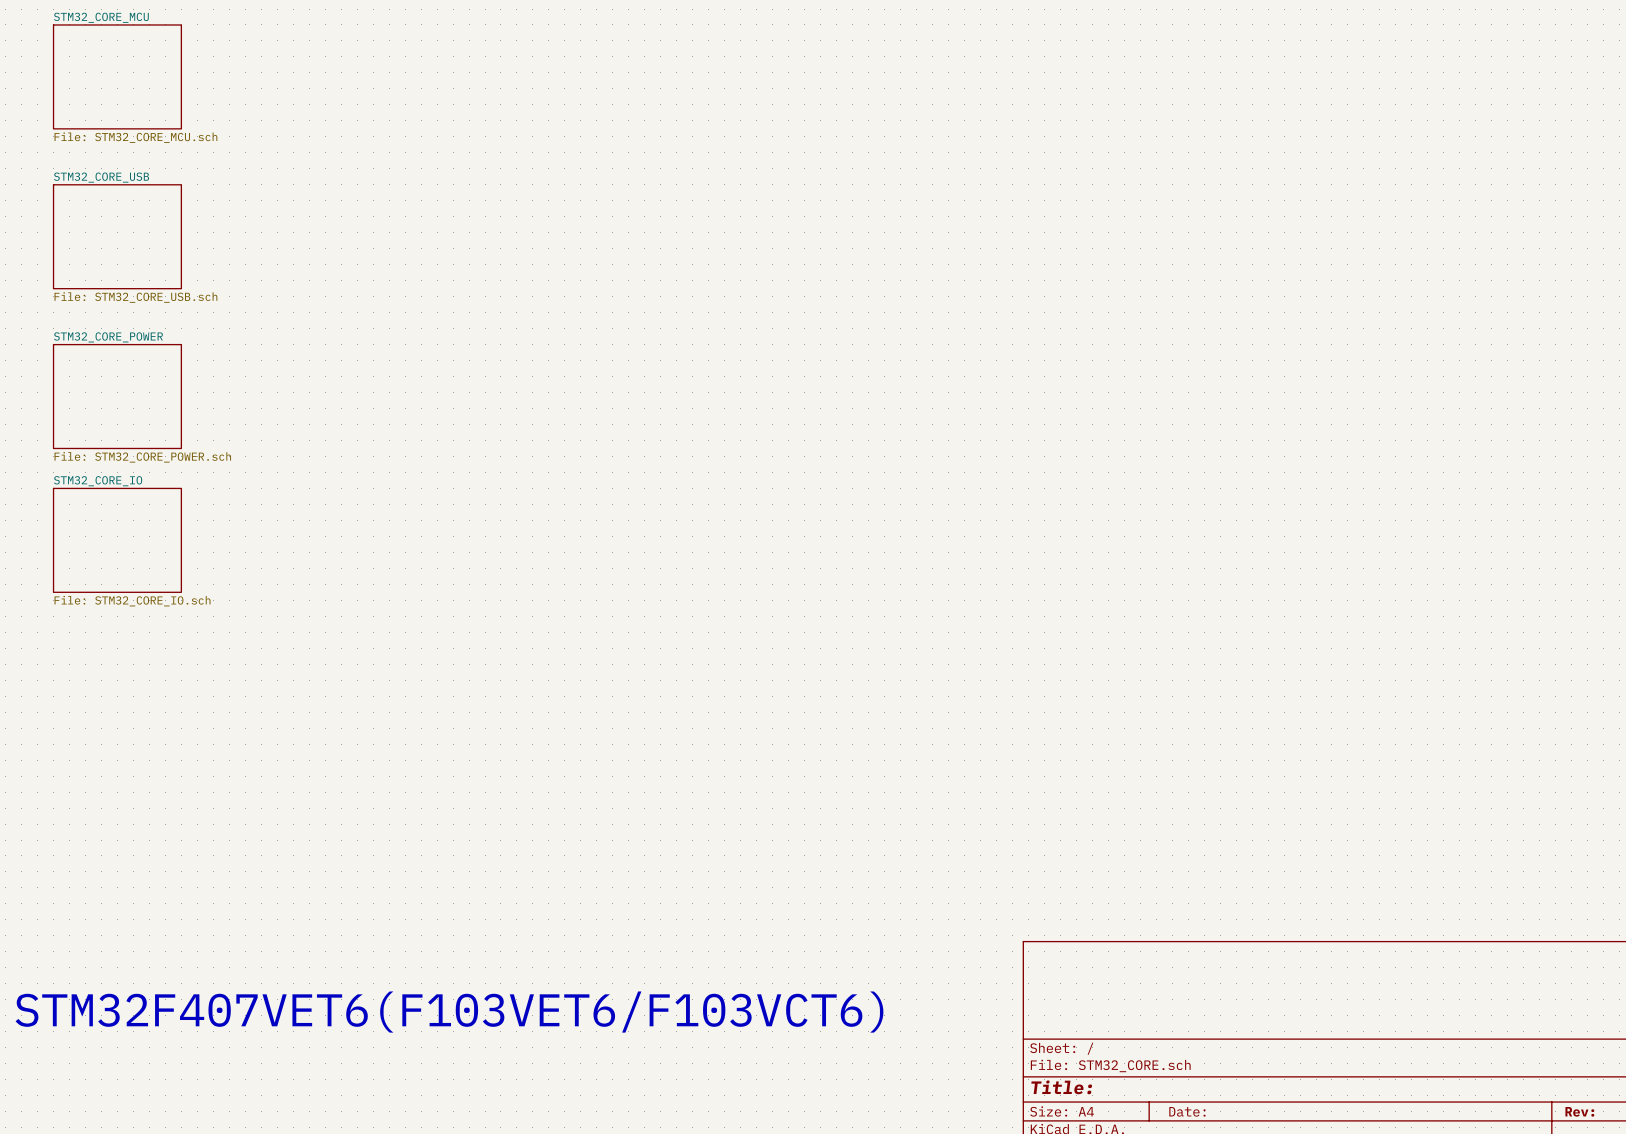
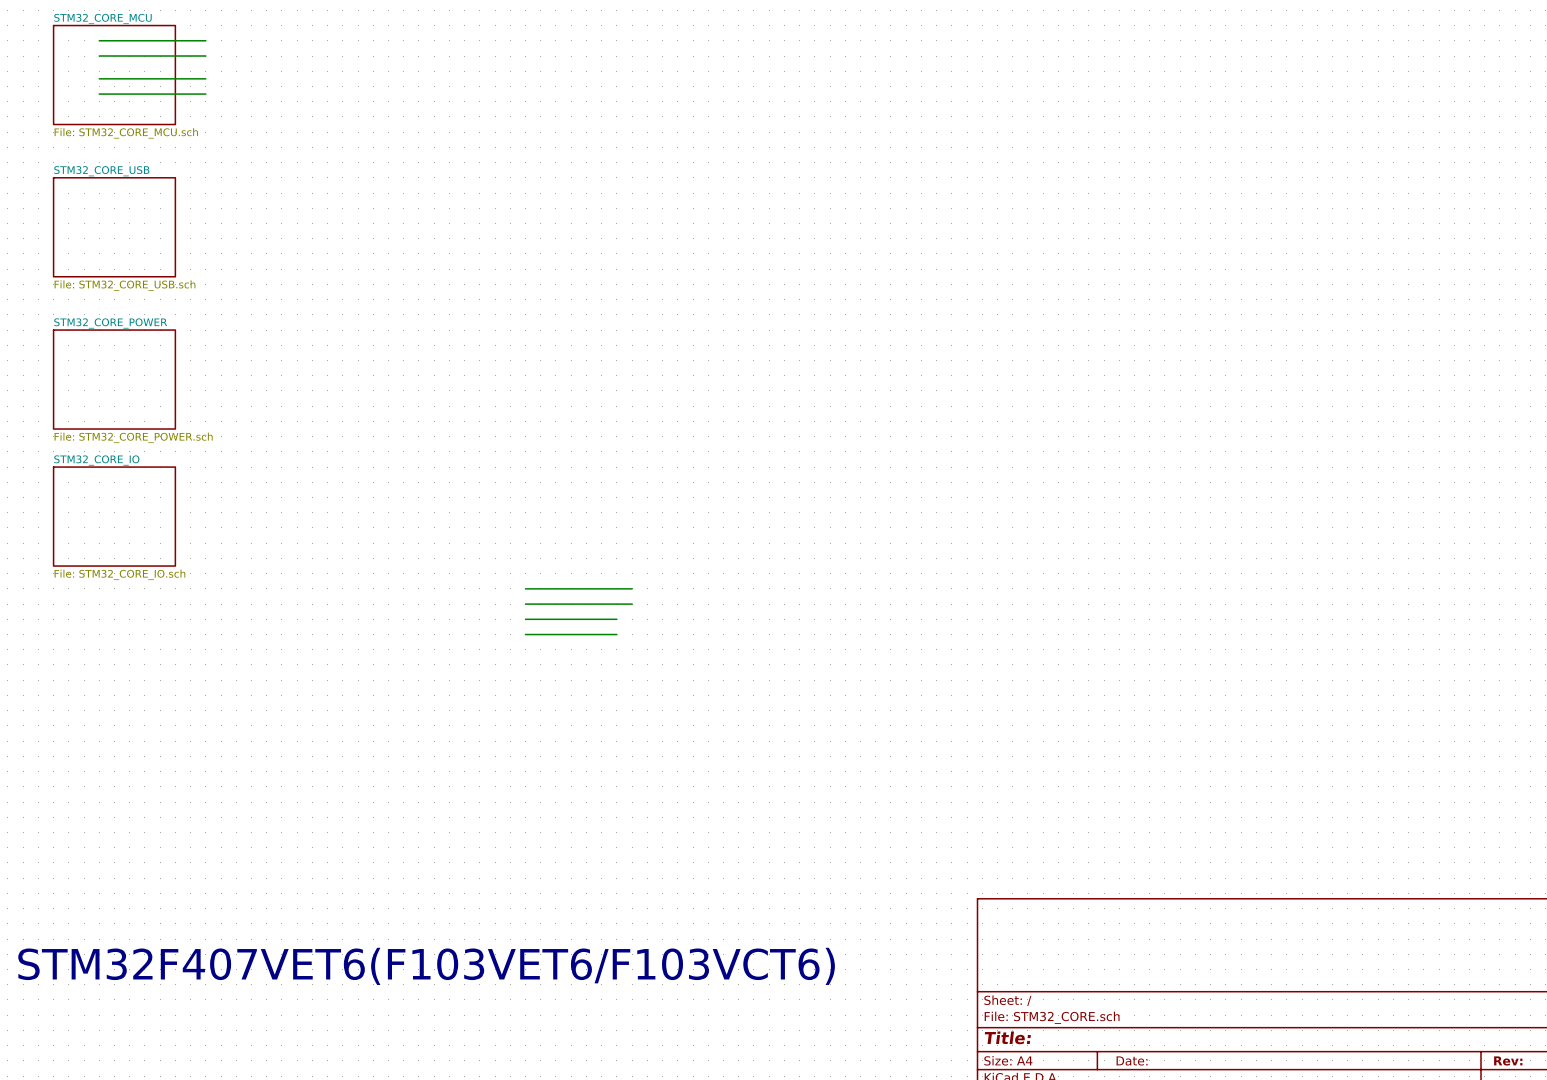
wire: none -> (99, 40) (205, 40)
wire: none -> (99, 56) (205, 56)
wire: none -> (99, 78) (205, 78)
wire: none -> (99, 94) (205, 94)
wire: none -> (525, 588) (632, 588)
wire: none -> (525, 604) (632, 604)
wire: none -> (525, 619) (616, 619)
wire: none -> (525, 634) (616, 634)

